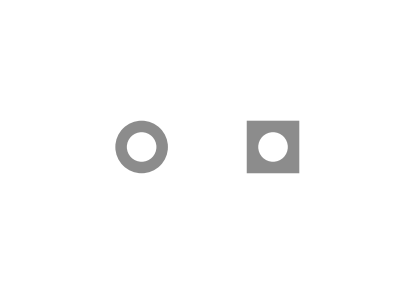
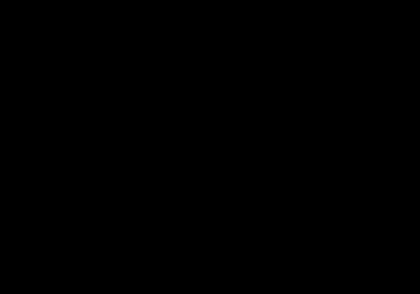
part: (207, 146) -> none

